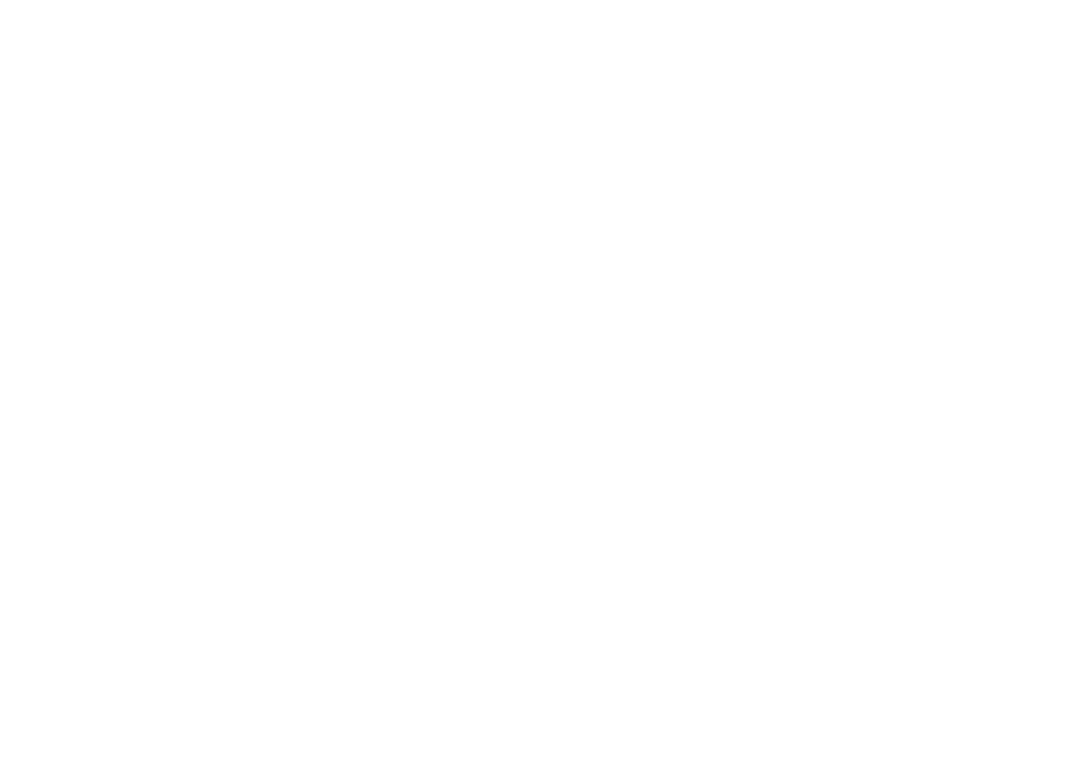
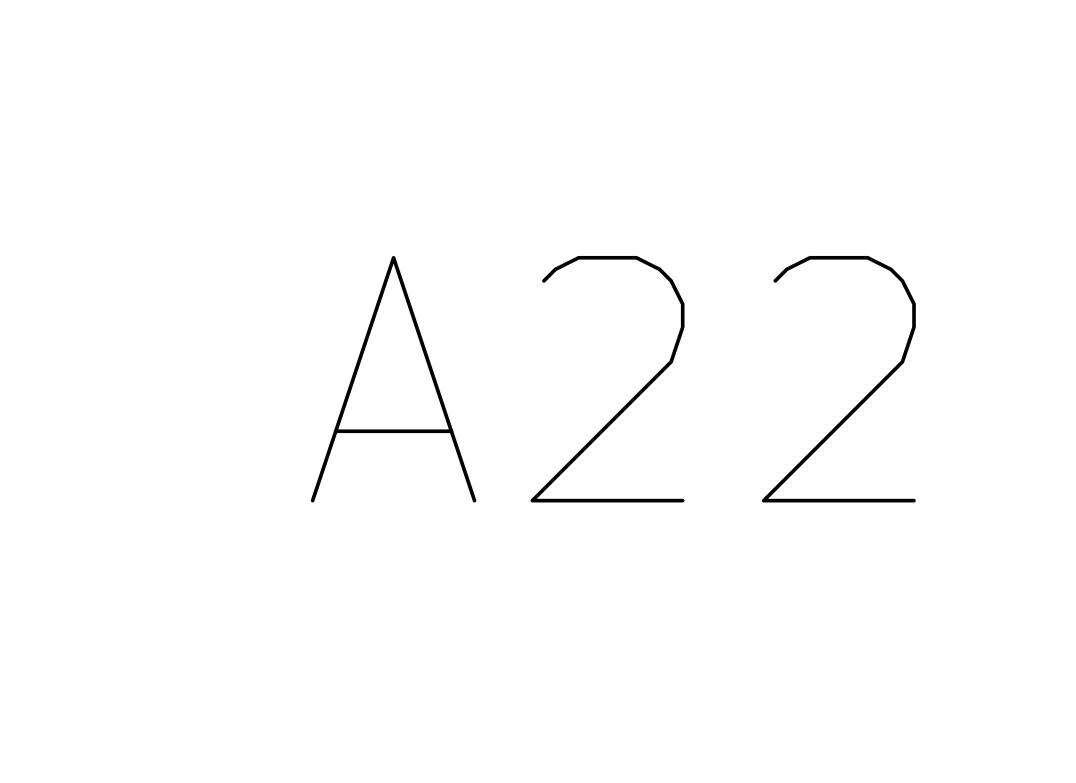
text: none -> A22 (613, 379)

